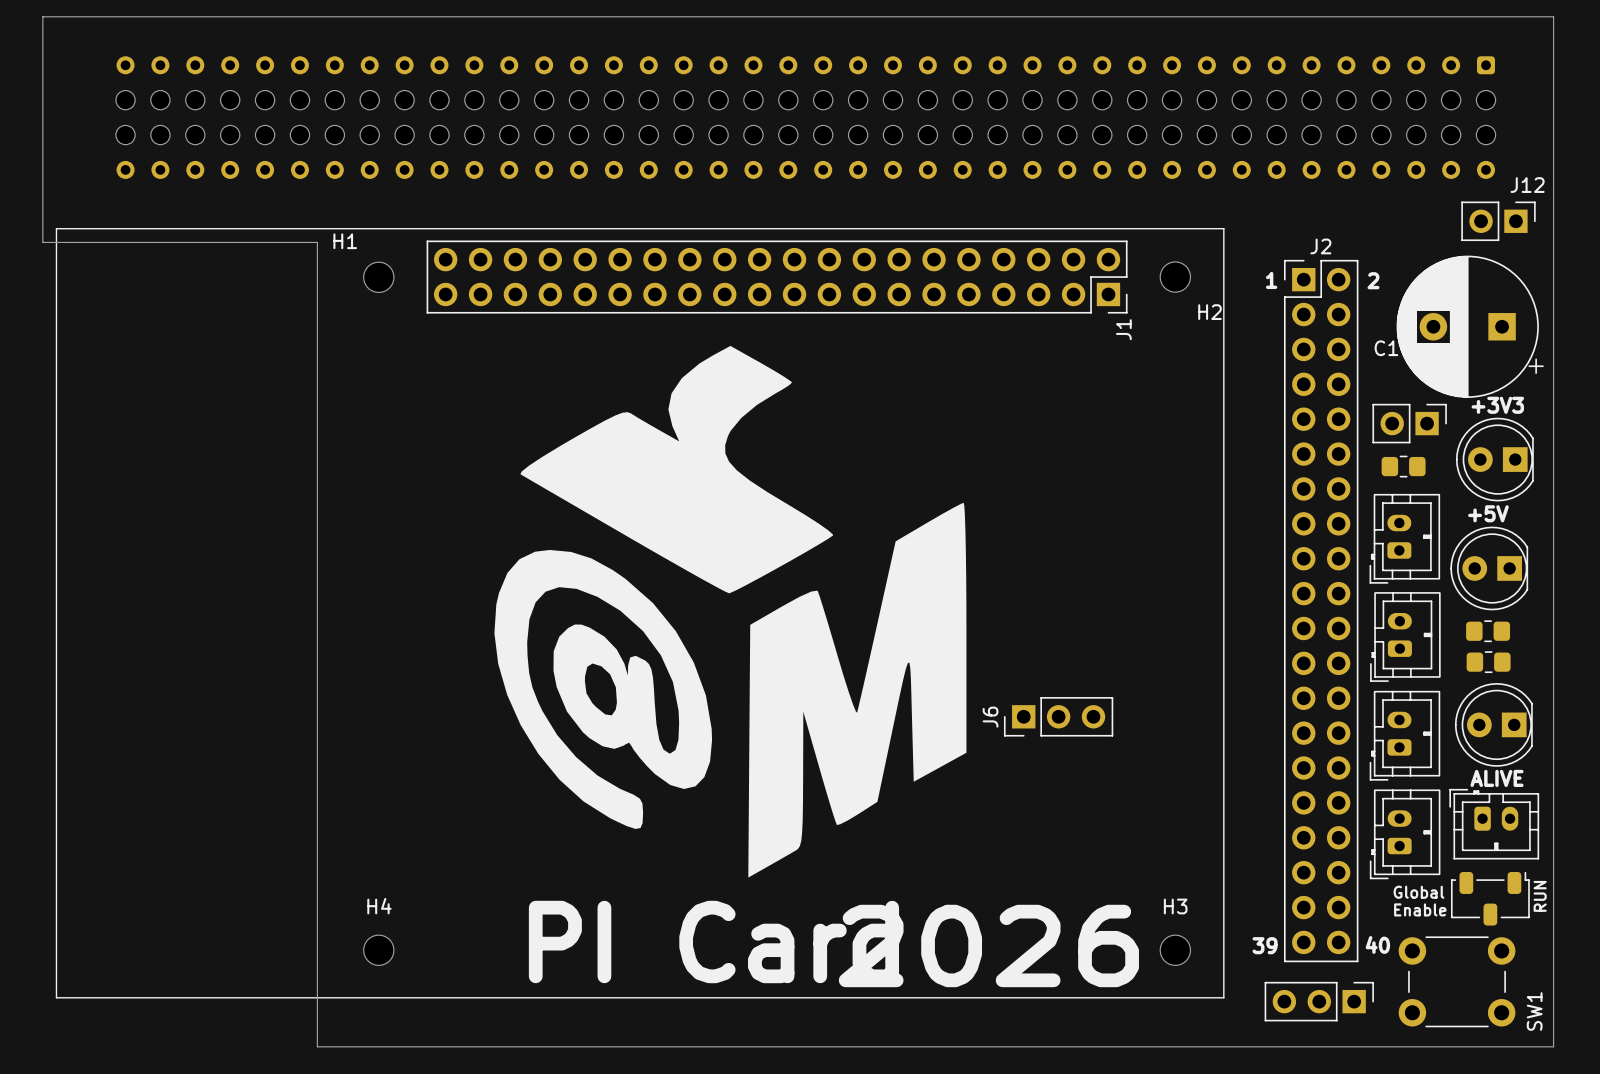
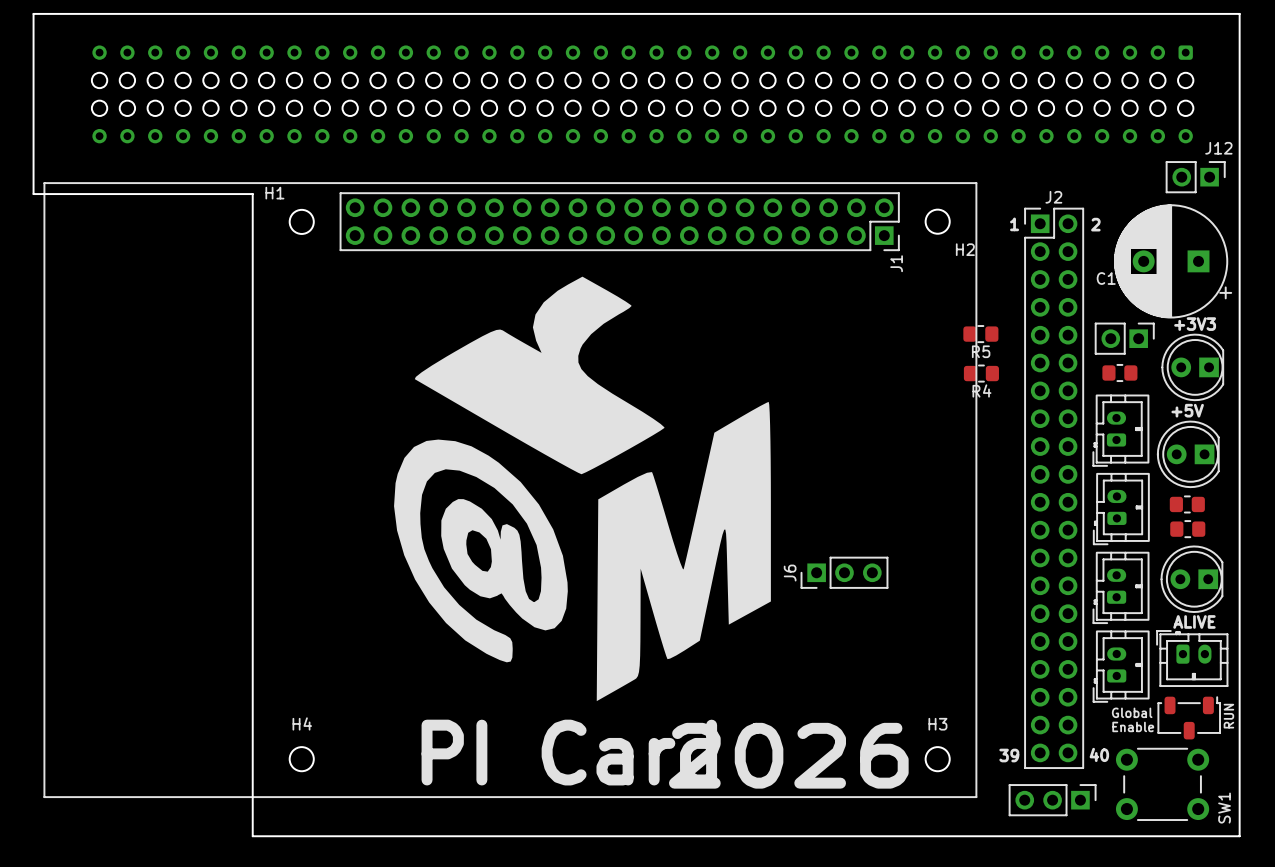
R5: none -> (980, 334)
R4: none -> (981, 373)

